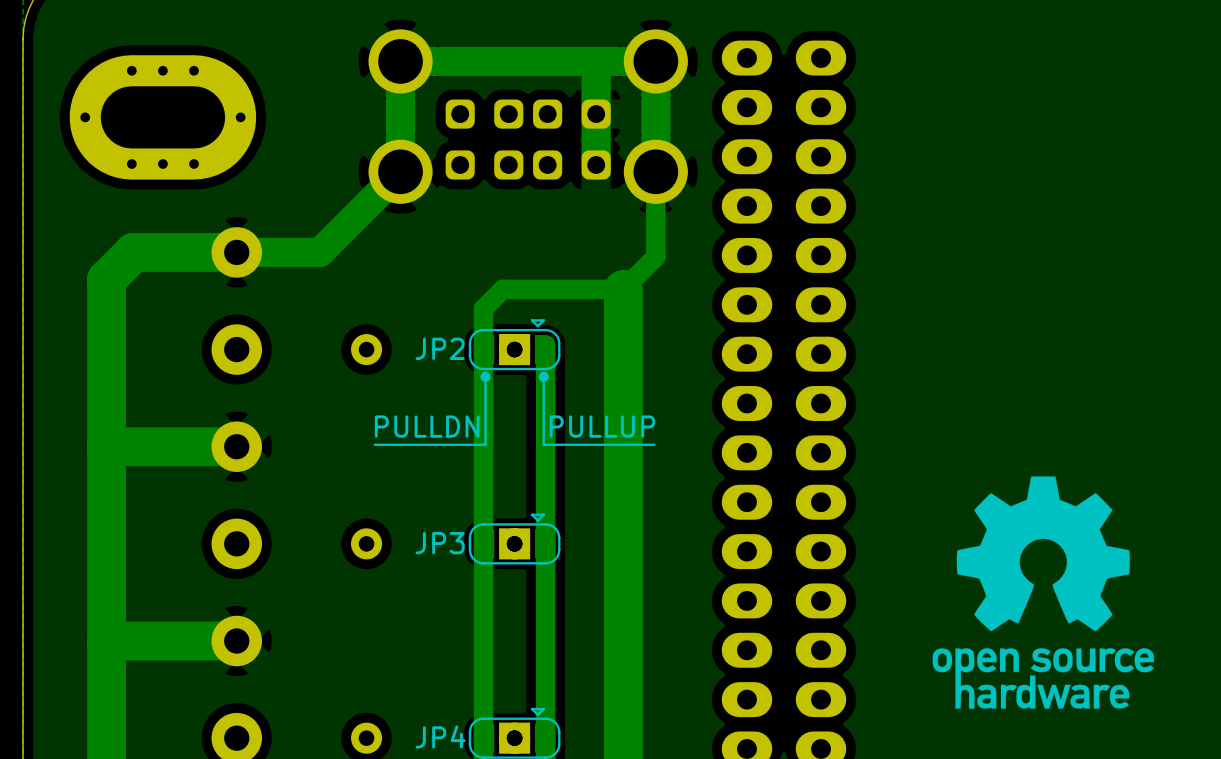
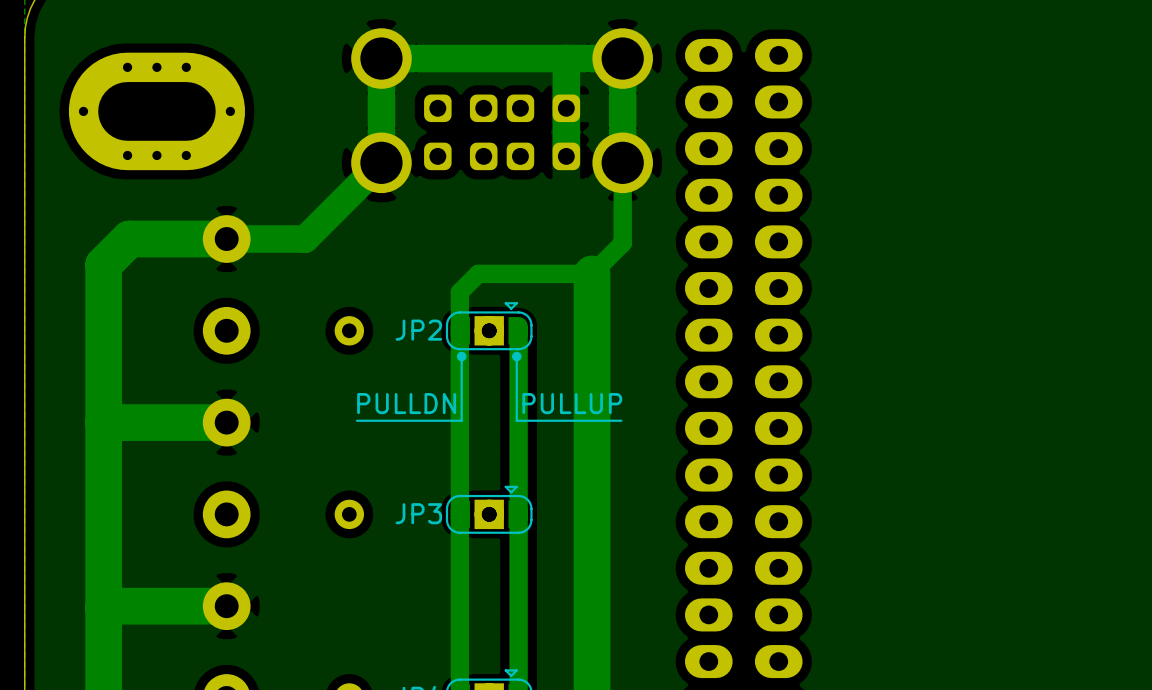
drawing: [932, 476, 1155, 709] -> none

